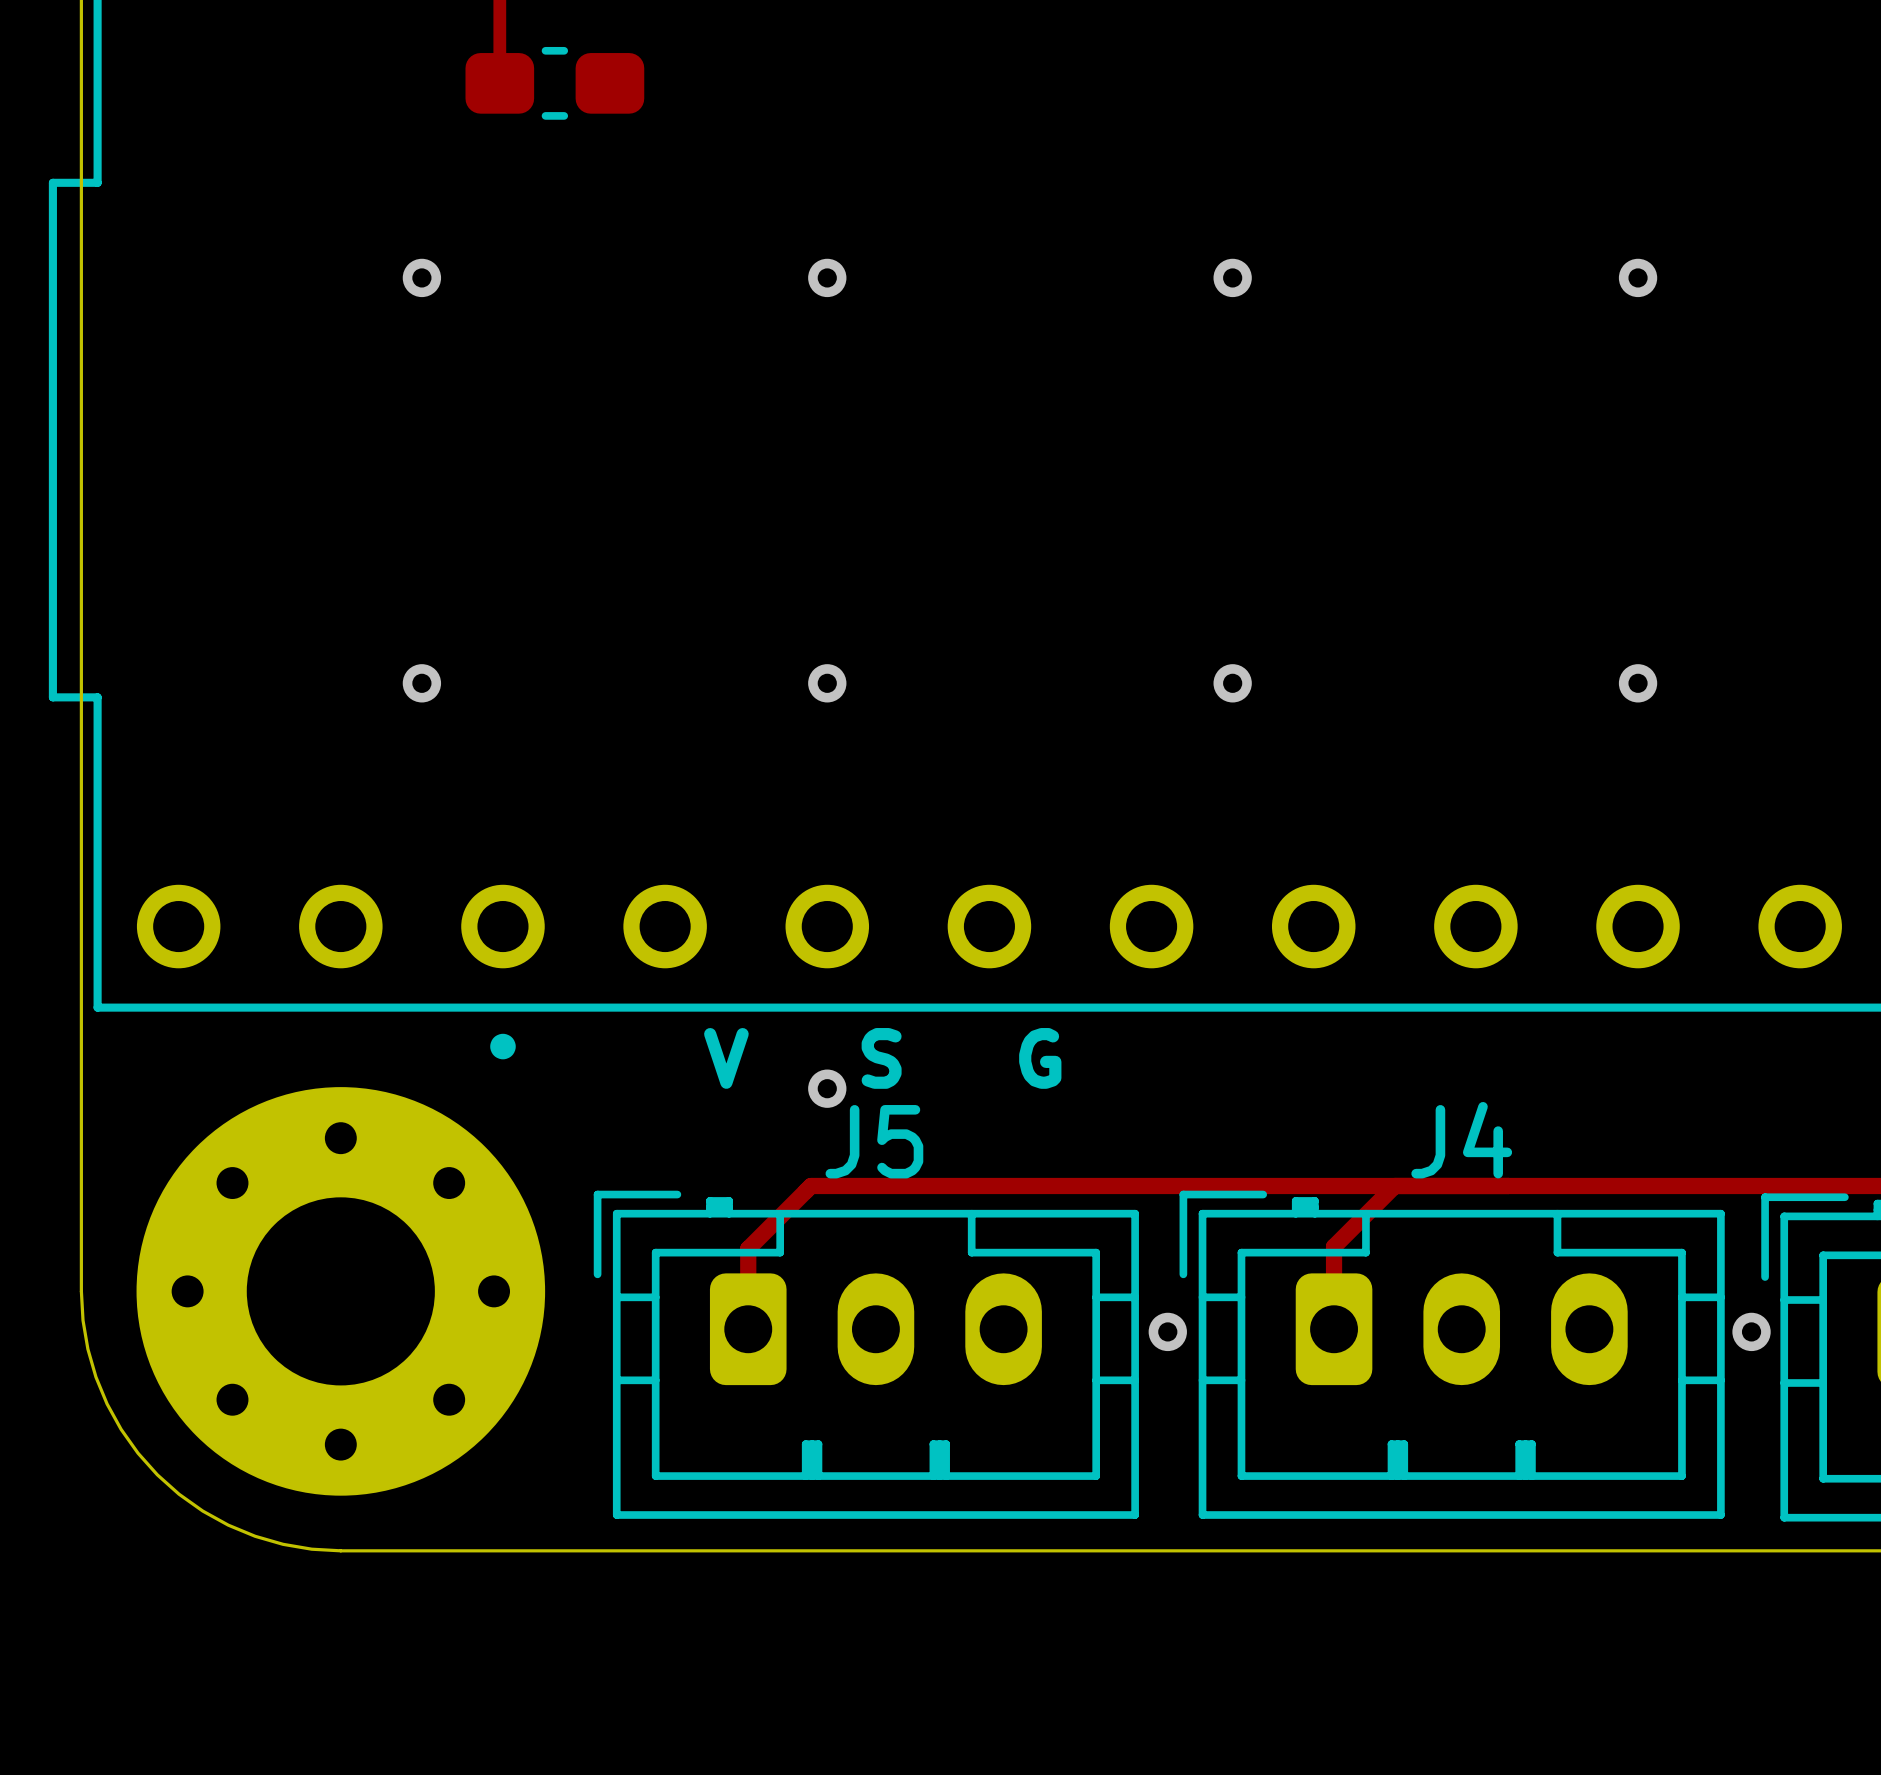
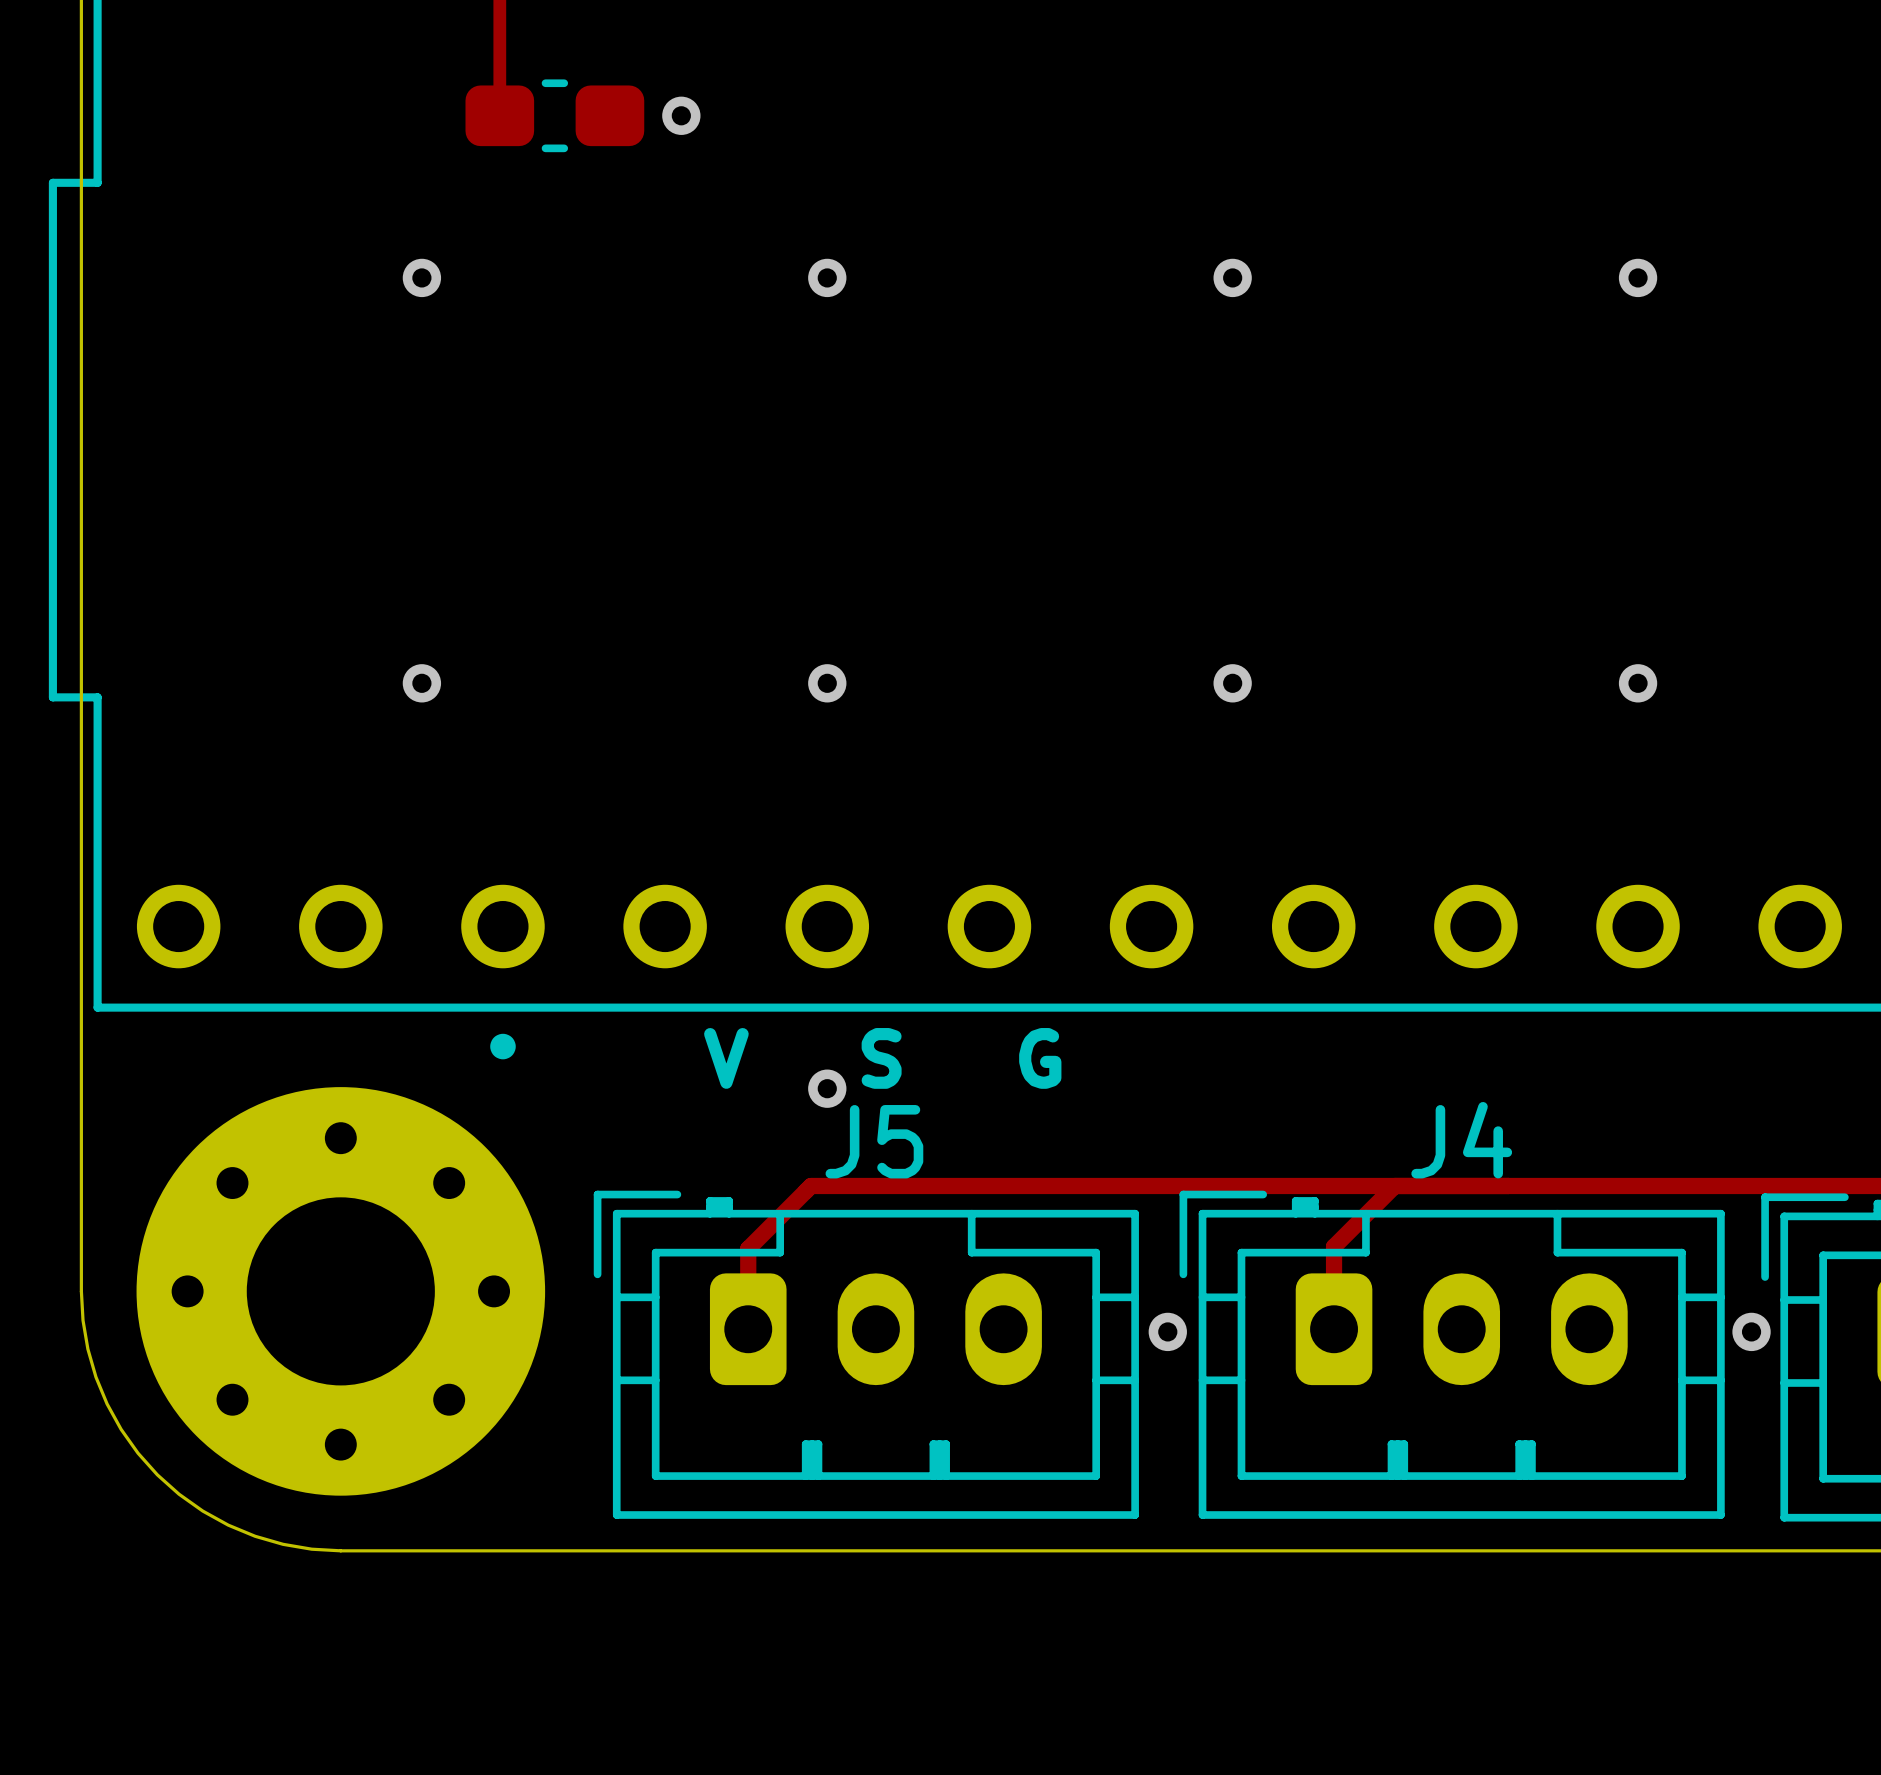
part position: (554, 83) -> (554, 115)
via: none -> (681, 115)

